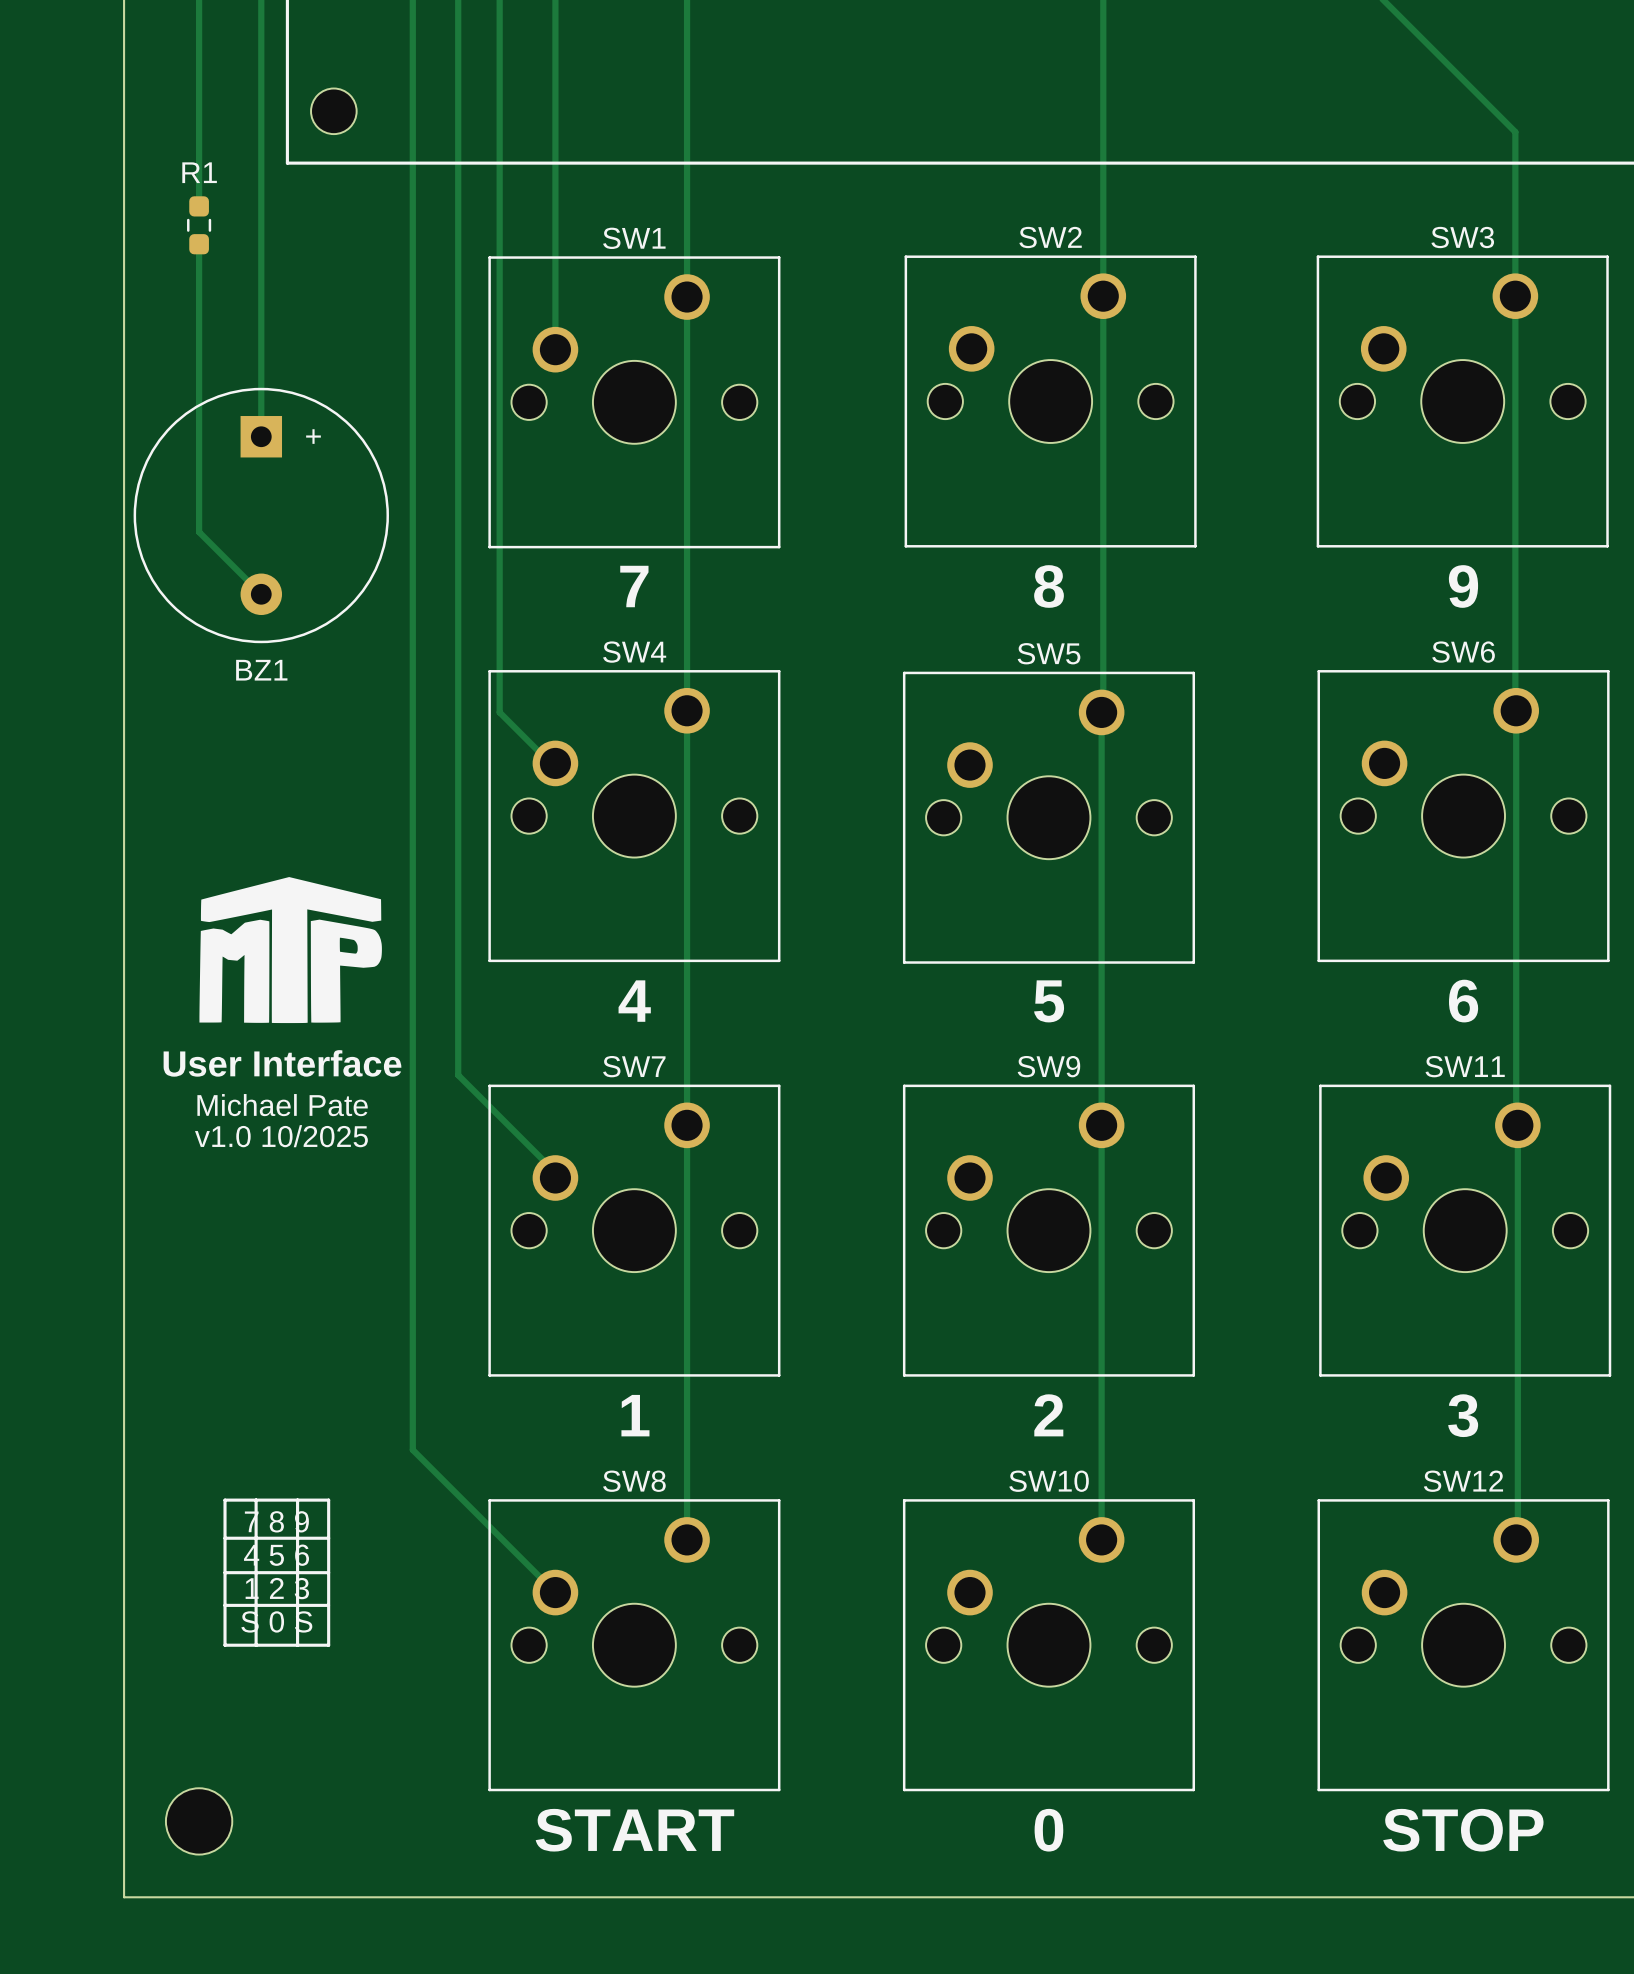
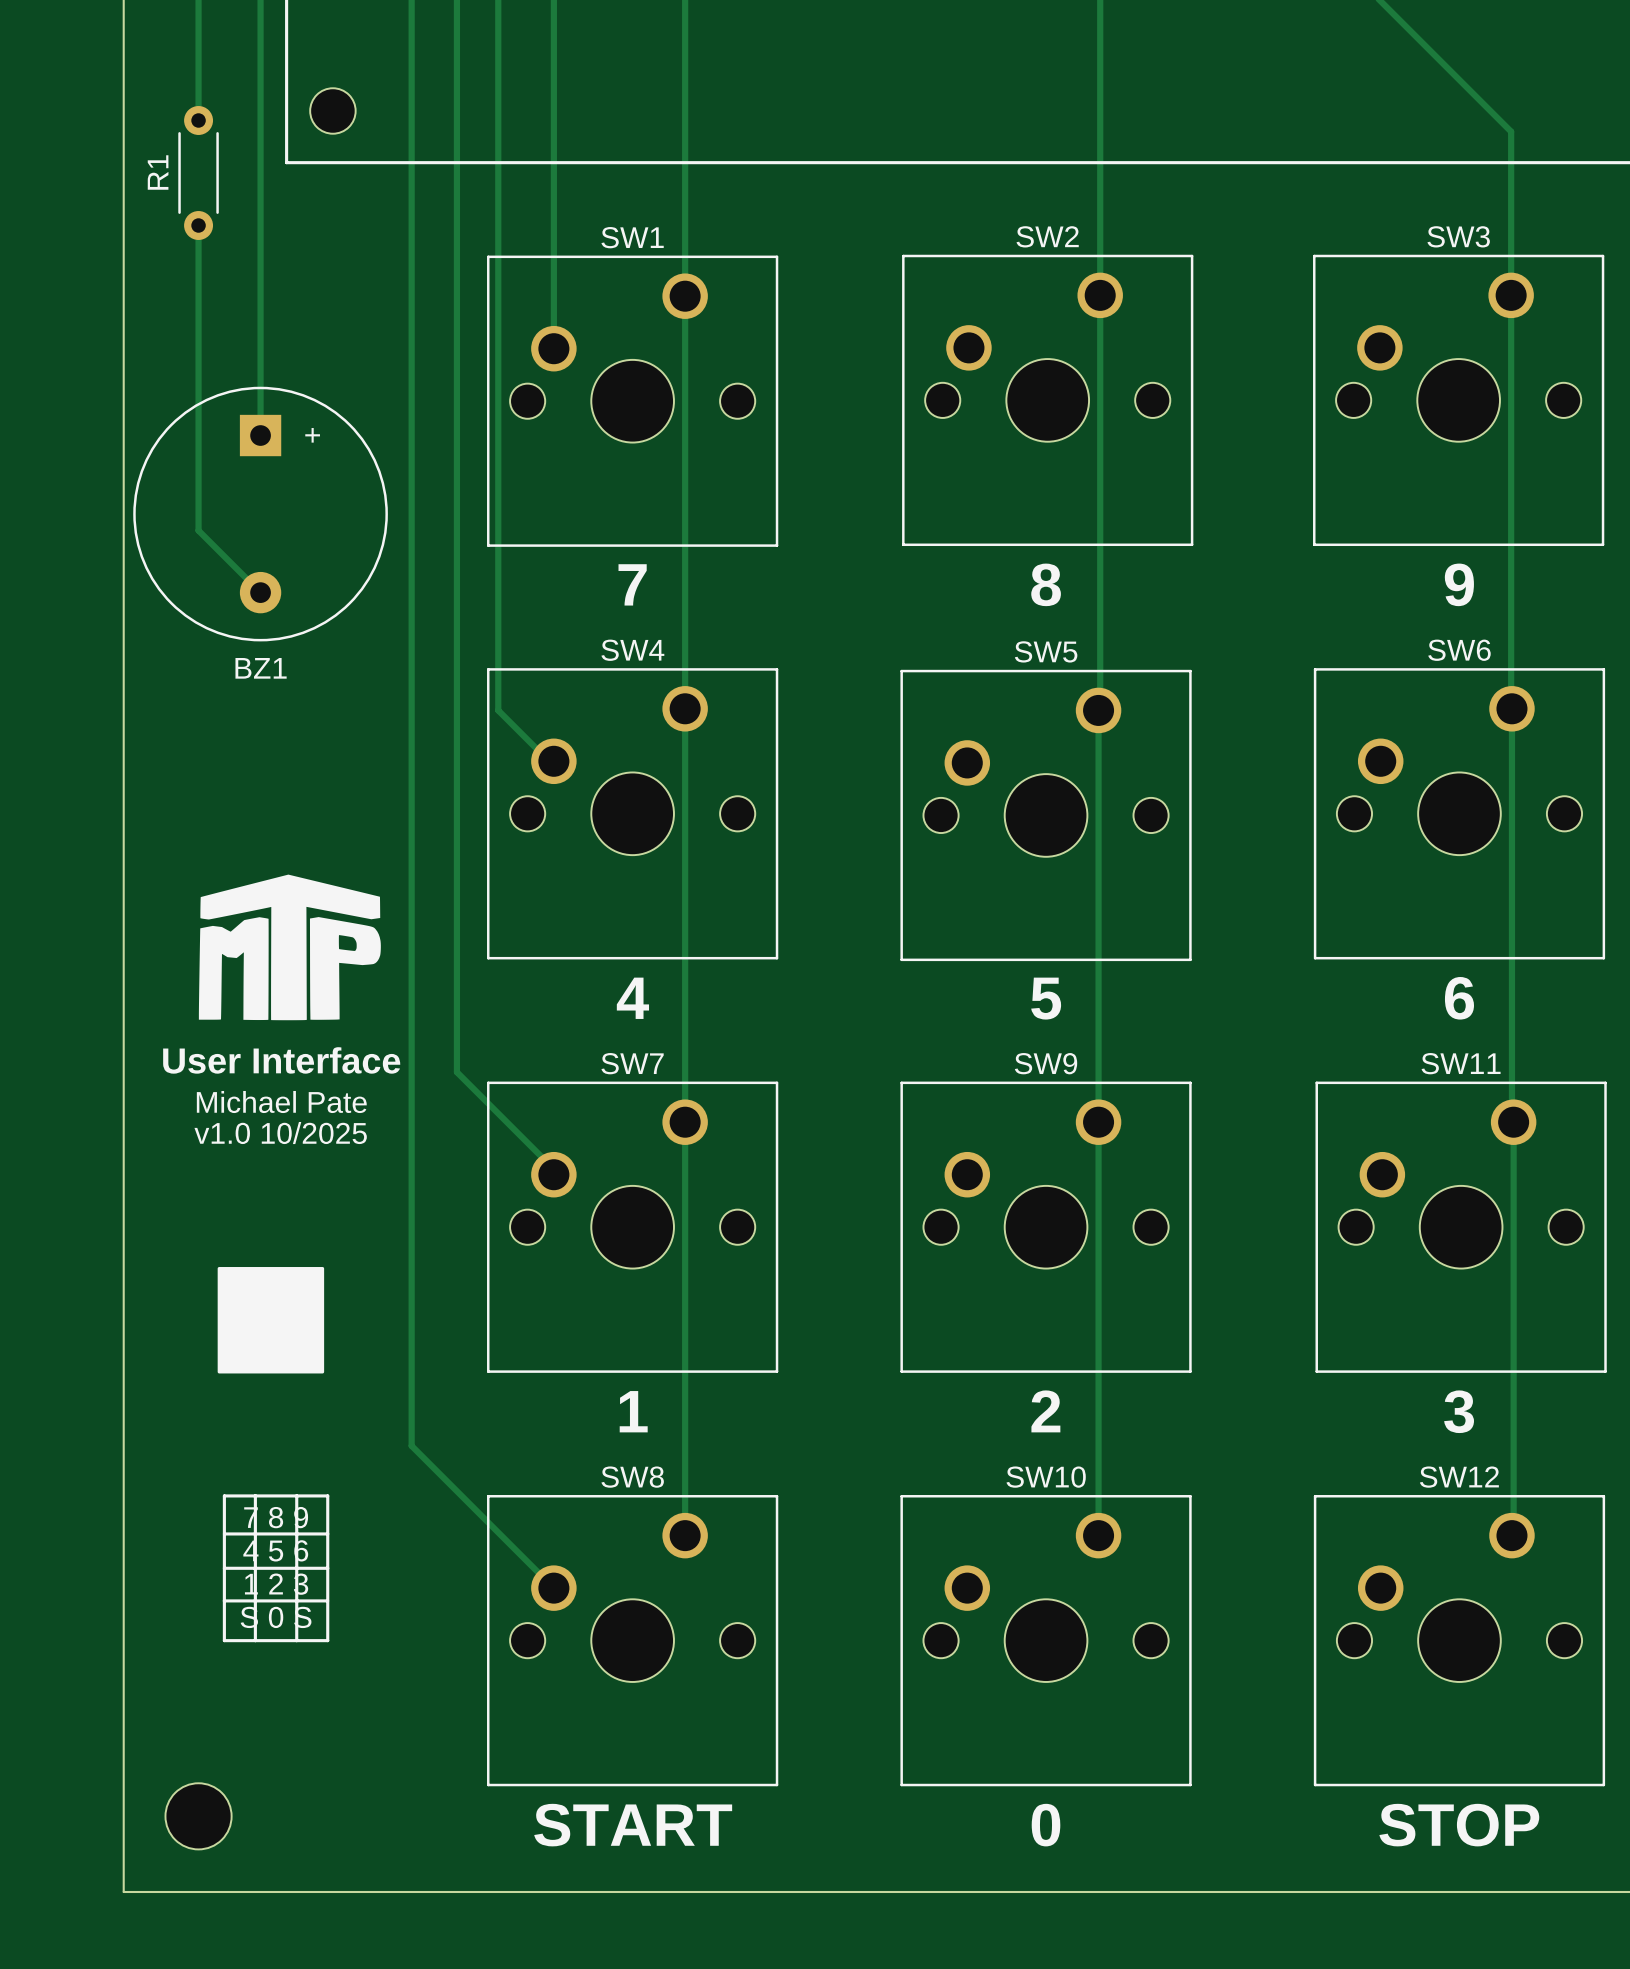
track: (199, 120) (199, 206) -> none
R1 name position: R1 (199, 172) -> R1 (158, 172)
R1 footprint: [187, 196, 212, 255] -> [178, 106, 219, 240]
drawing: none -> [217, 1267, 325, 1374]

